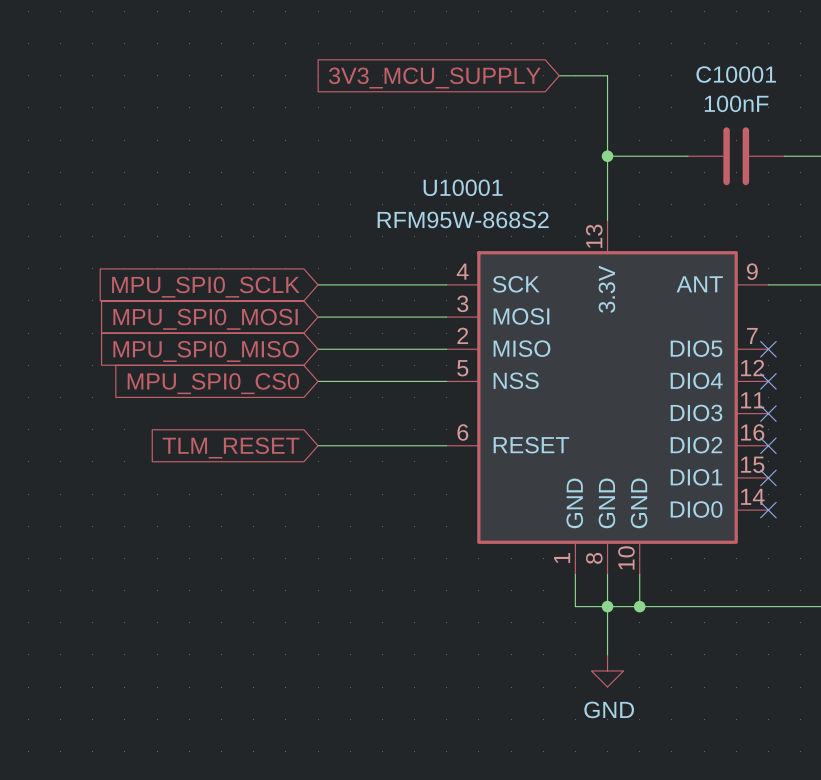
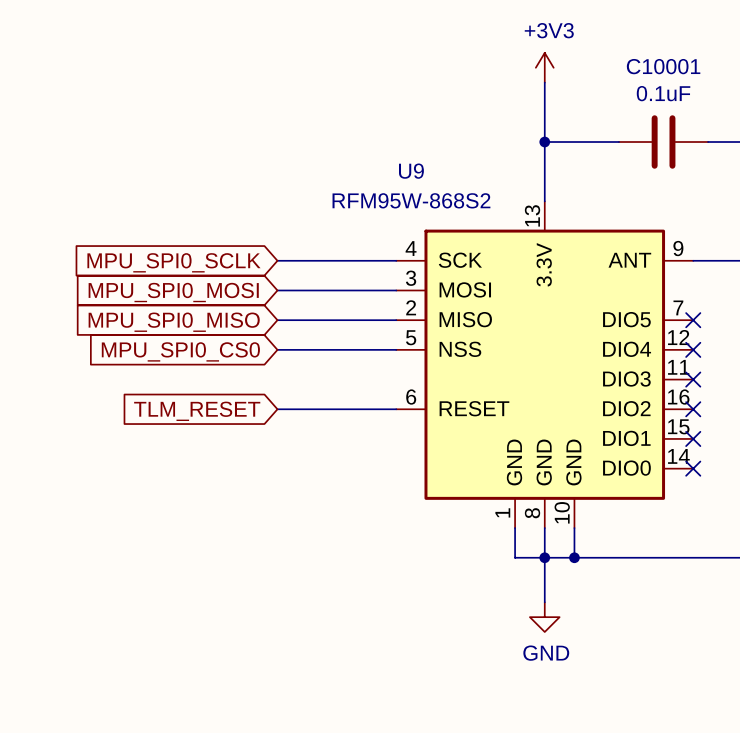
wire: (559, 75) (607, 75) (607, 91) -> none
power symbol: none -> +3V3 (544, 67)
global label: 3V3_MCU_SUPPLY (434, 78) -> none
C10001 value: 100nF (736, 103) -> 0.1uF (663, 93)
U10001 name: U10001 (463, 187) -> U9 (411, 171)

